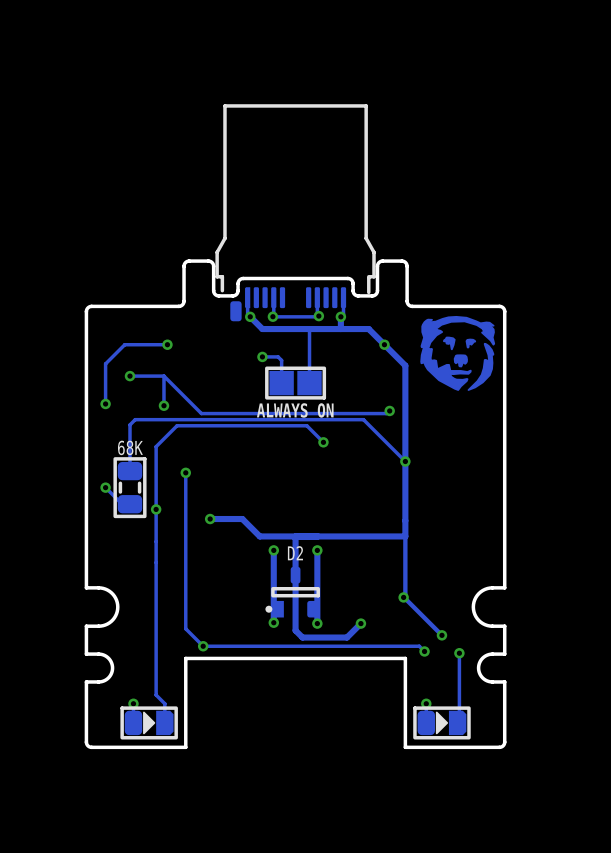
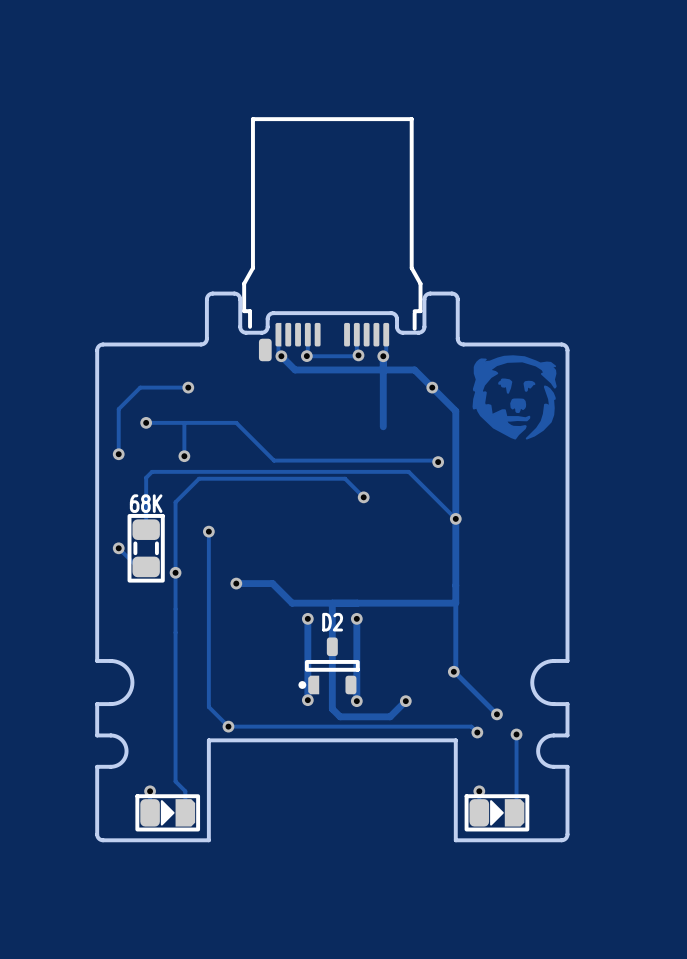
track: (309, 329) (309, 383) -> none
track: none -> (383, 369) (383, 426)
track: (262, 356) (278, 356) (281, 360) (281, 383) -> none
via: (262, 356) -> none
track: (163, 376) (201, 413) (386, 413) (389, 410) -> (184, 422) (236, 422) (274, 460) (434, 460)
part: ALWAYS ON (295, 383) -> none

